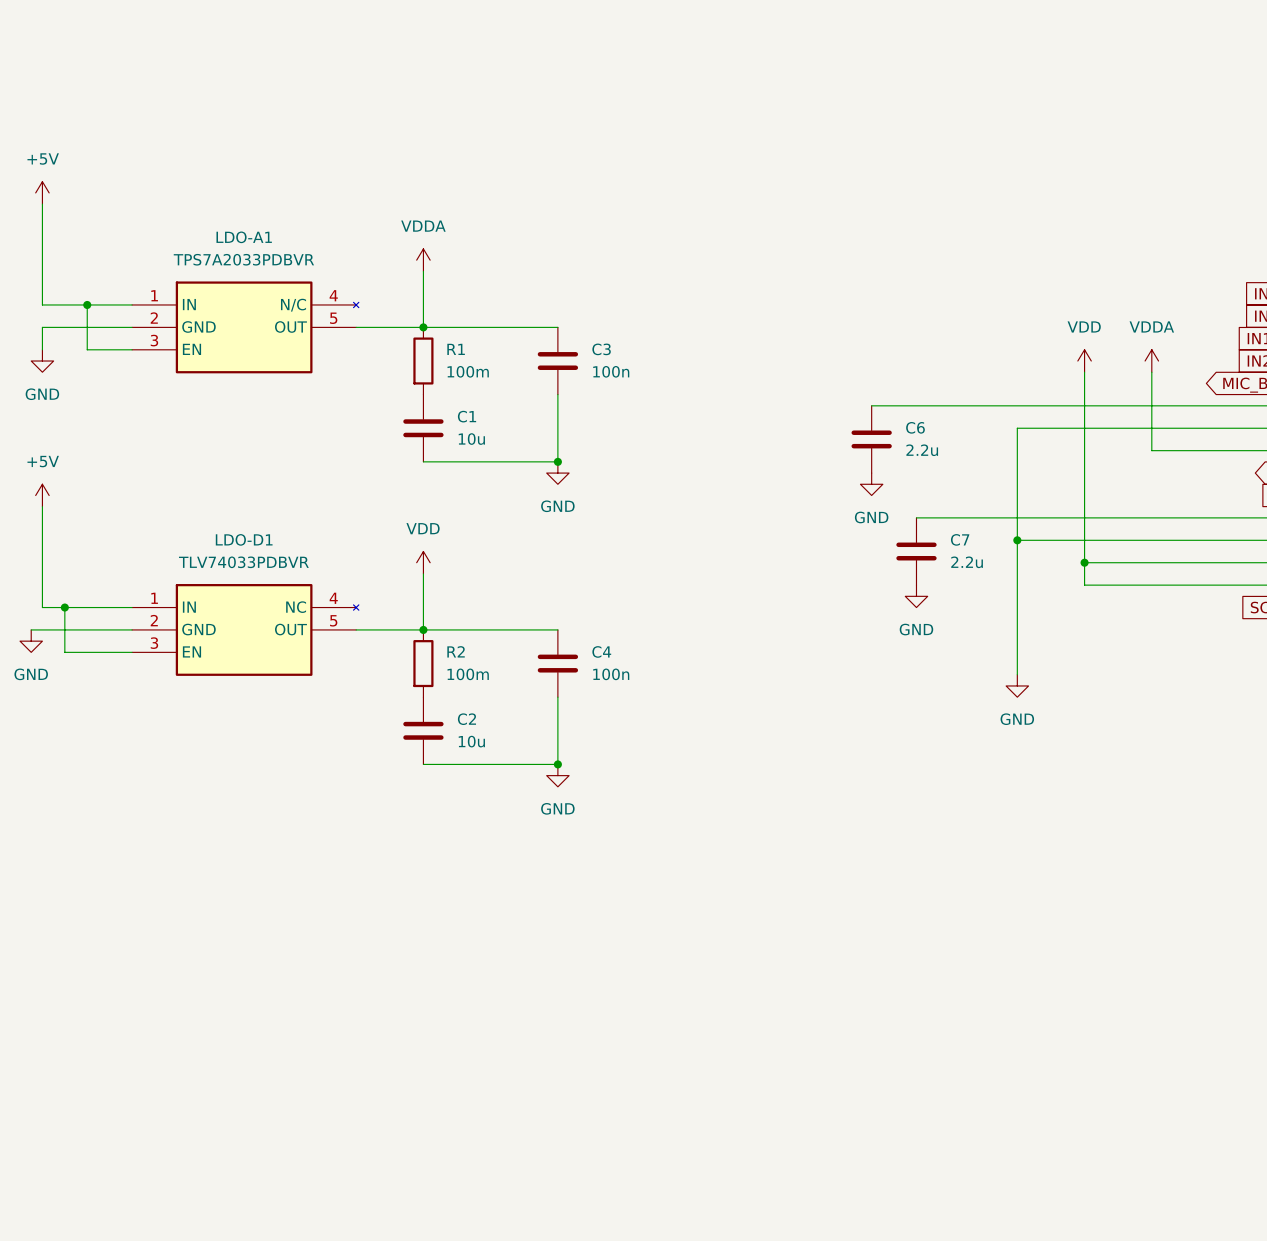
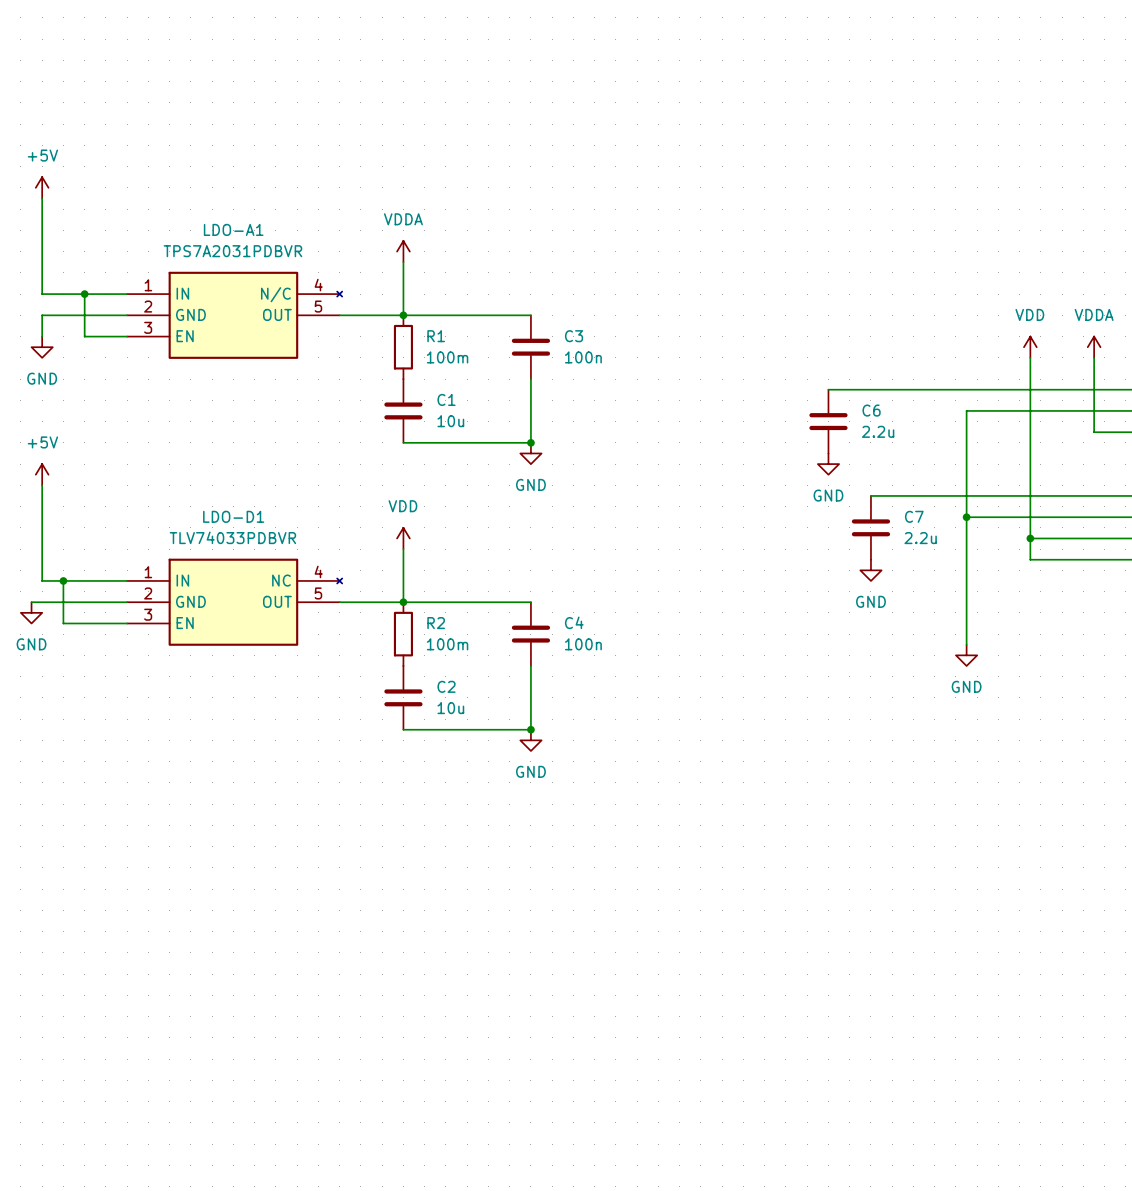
LDO-A1 value: TPS7A2033PDBVR (243, 259) -> TPS7A2031PDBVR (232, 251)

